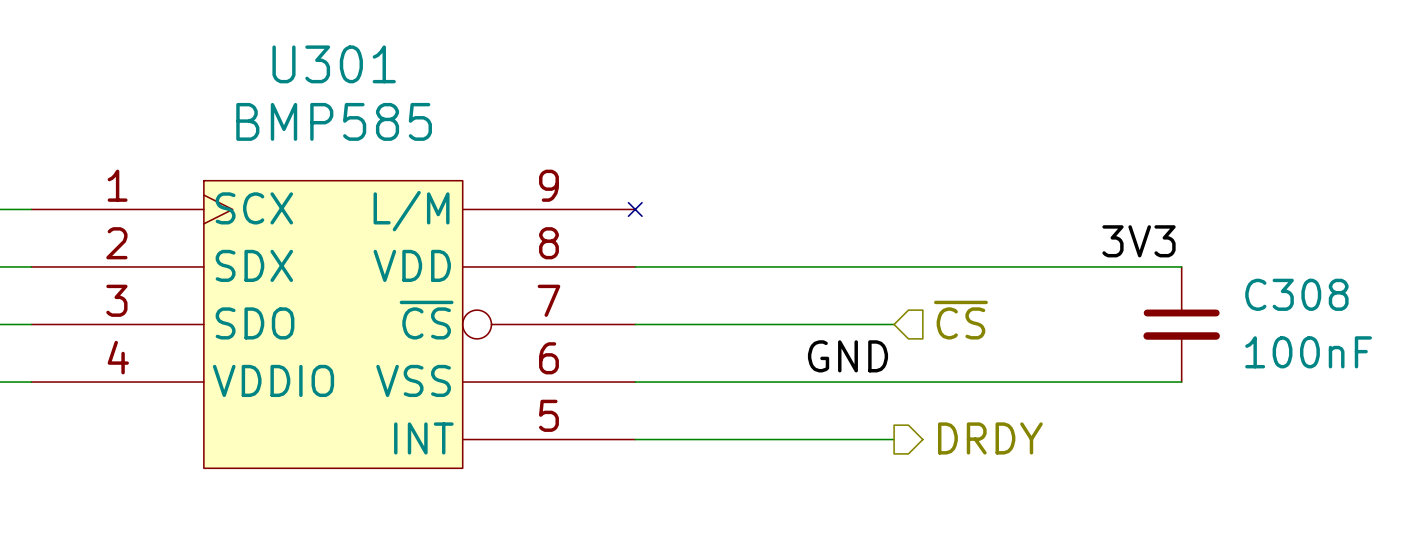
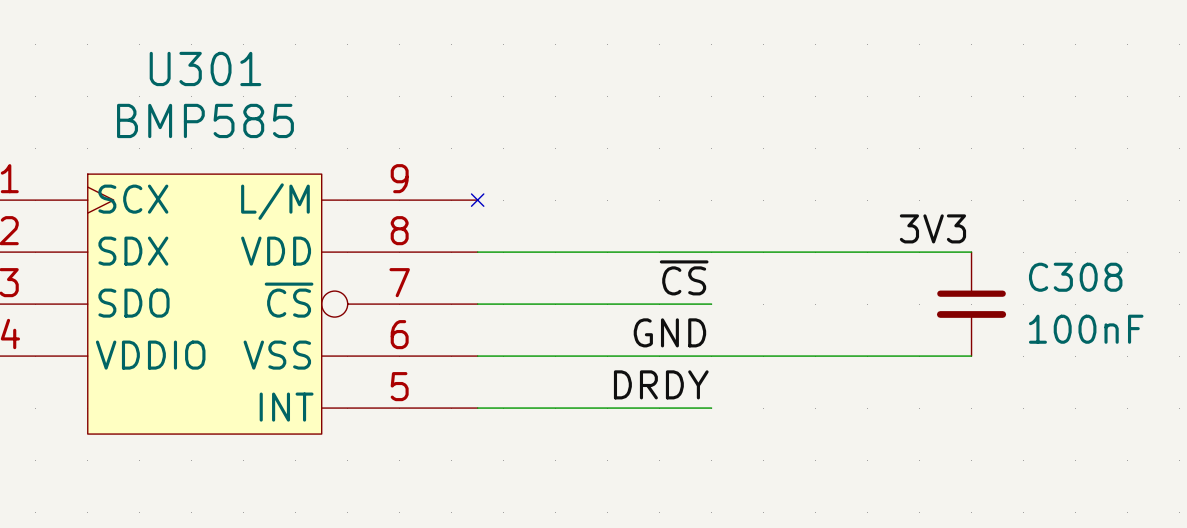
label: none -> ~{CS} (684, 277)
hierarchical label: ~{CS} (960, 320) -> none
label: none -> DRDY (661, 384)
hierarchical label: DRDY (990, 438) -> none

